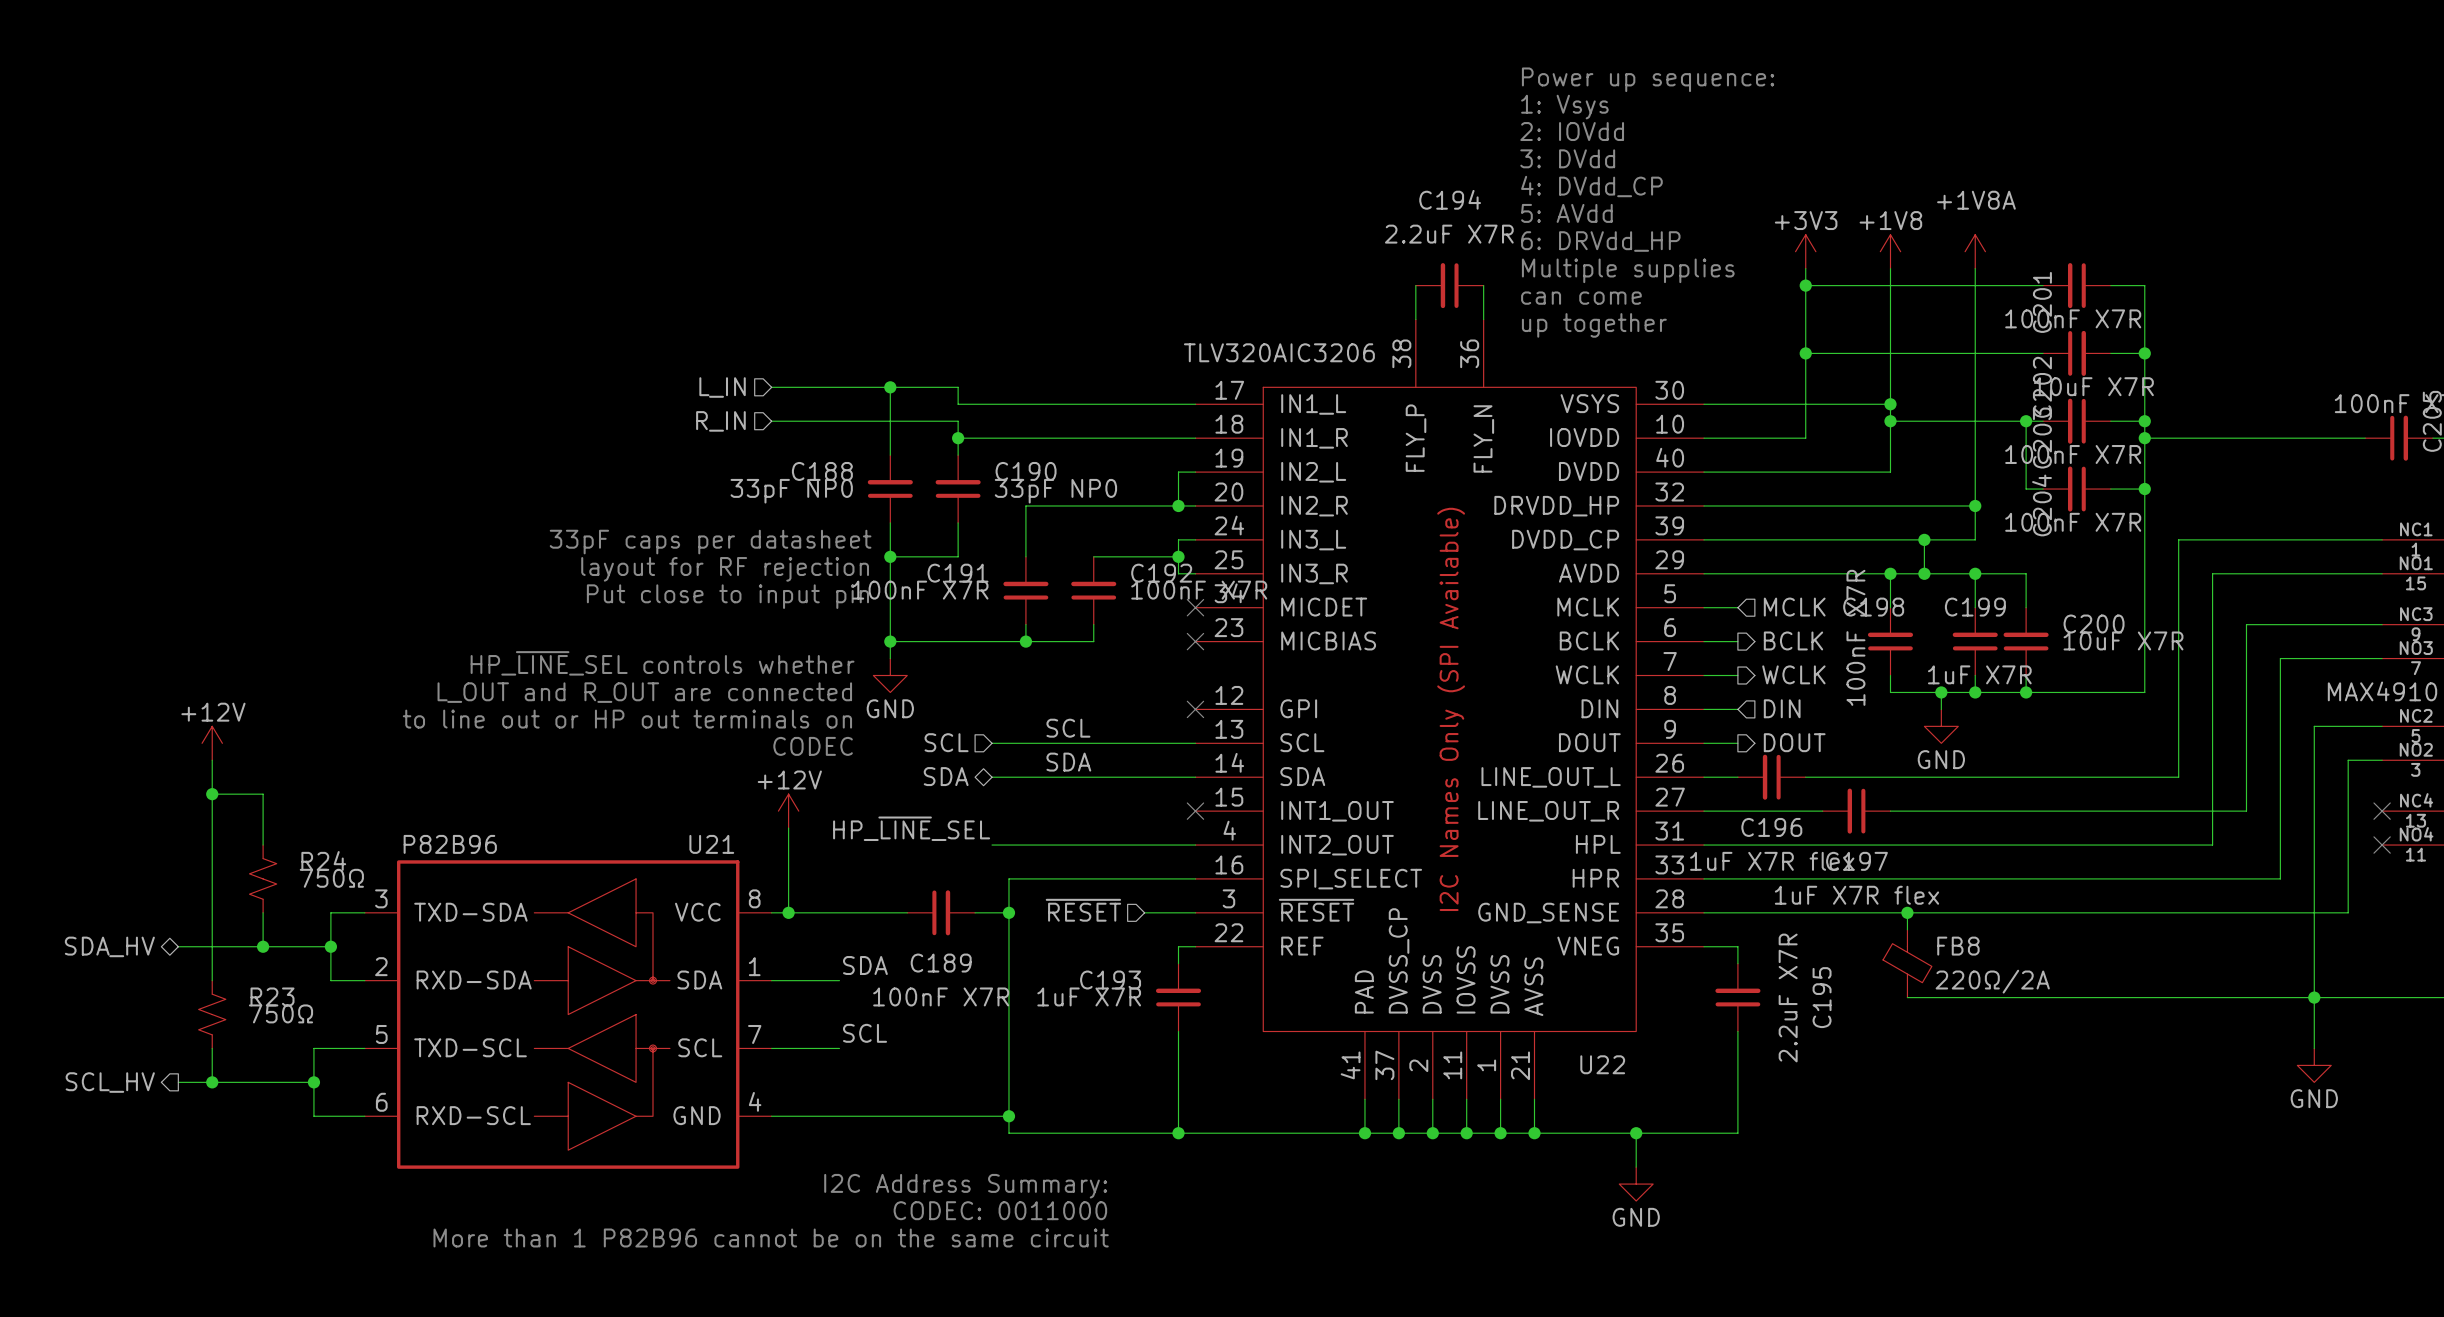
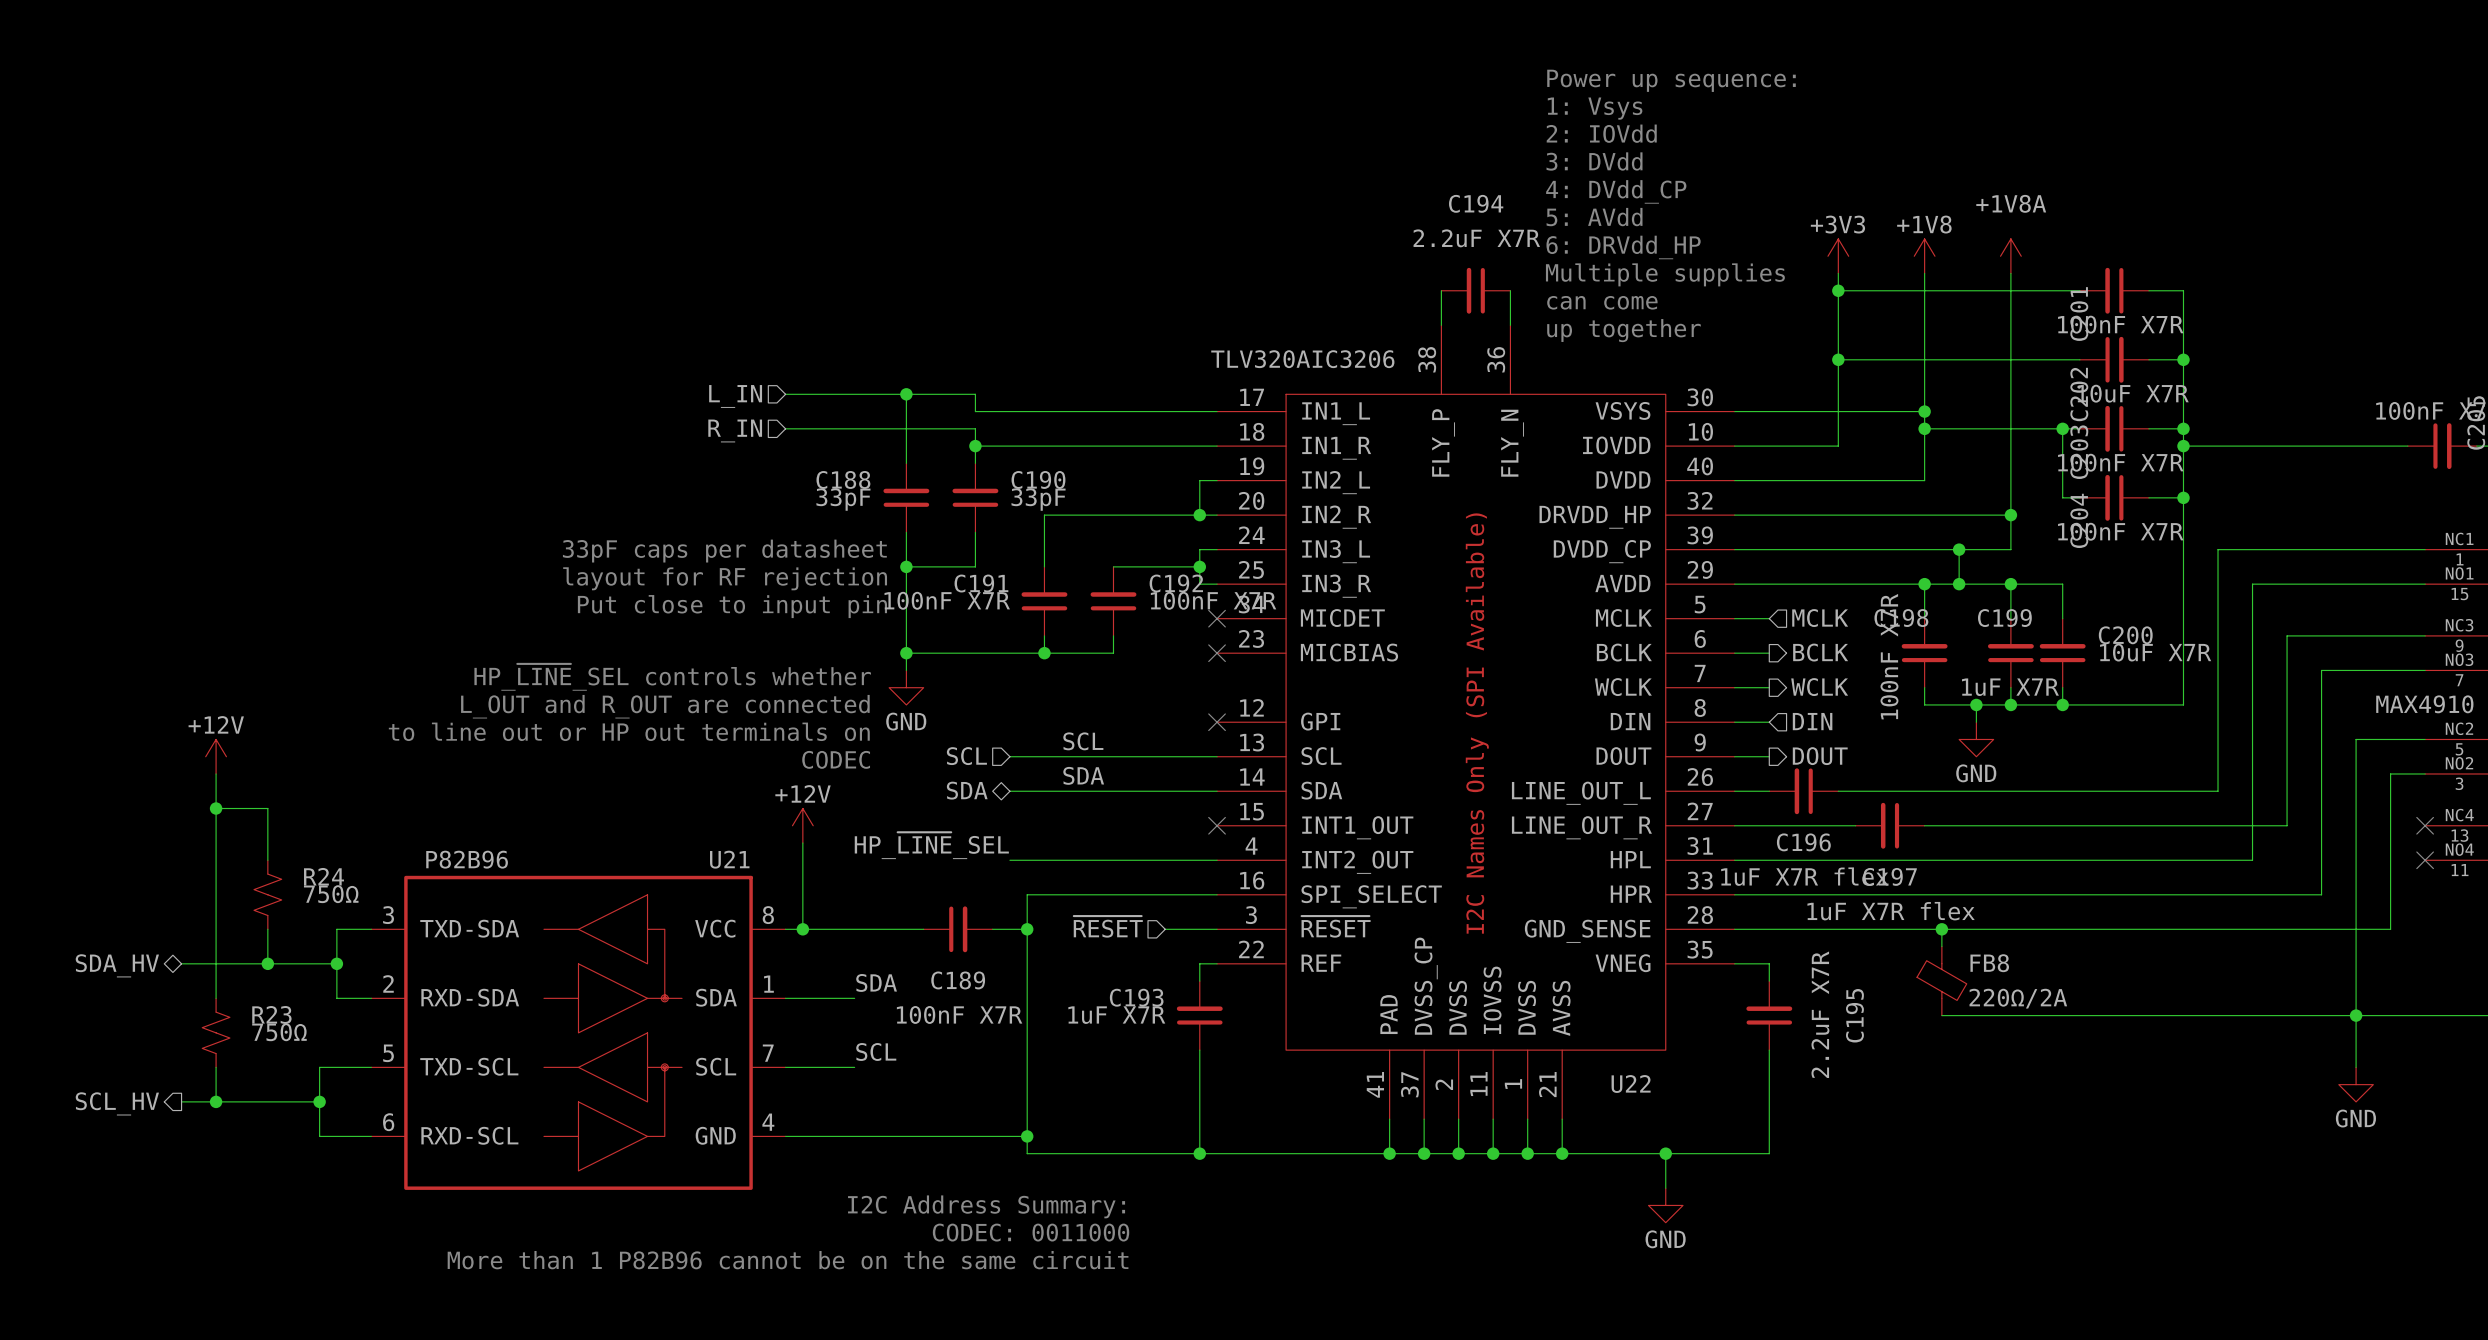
C188 value: 33pF NP0 (791, 491) -> 33pF (843, 499)
C190 value: 33pF NP0 (1055, 491) -> 33pF (1038, 499)

